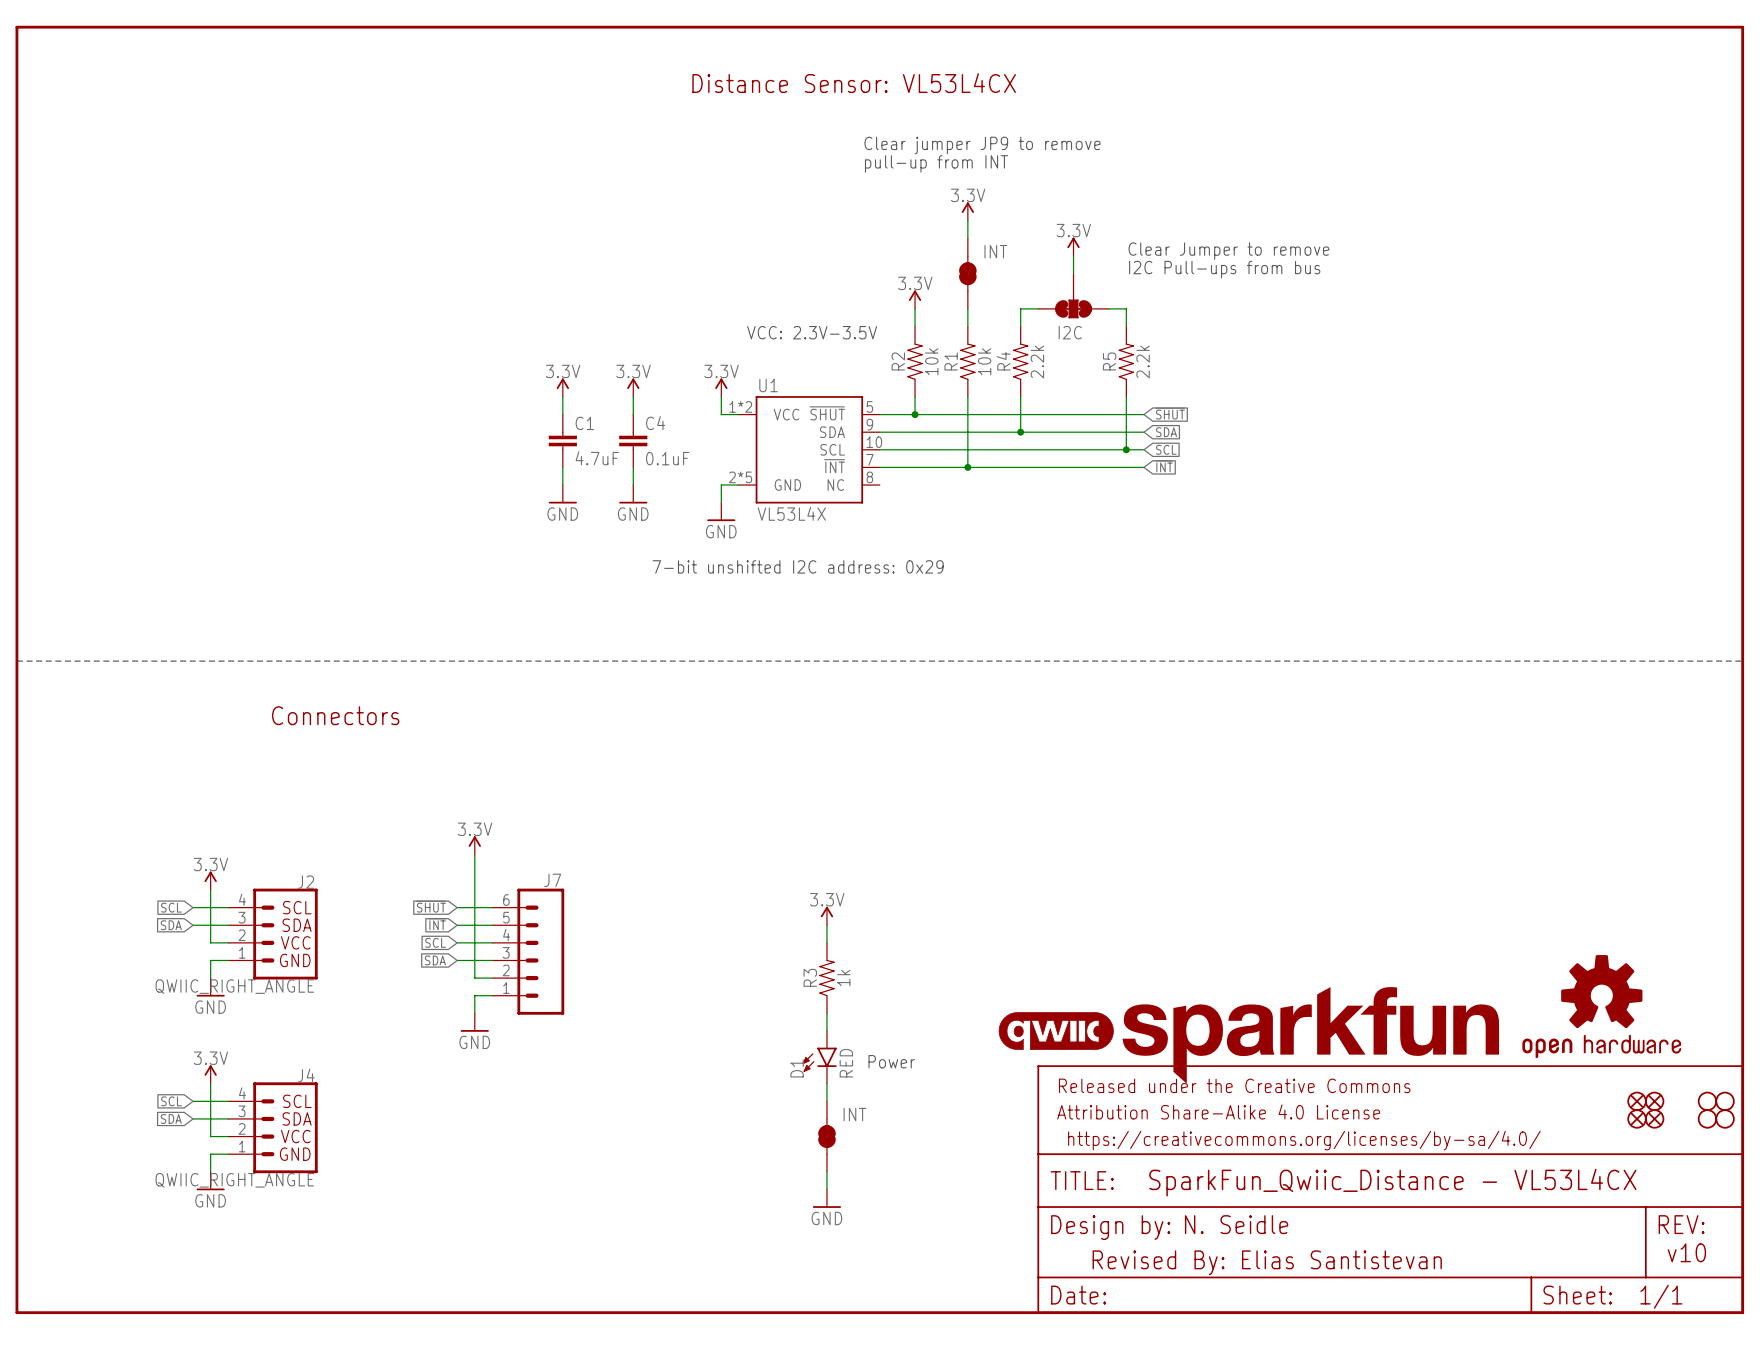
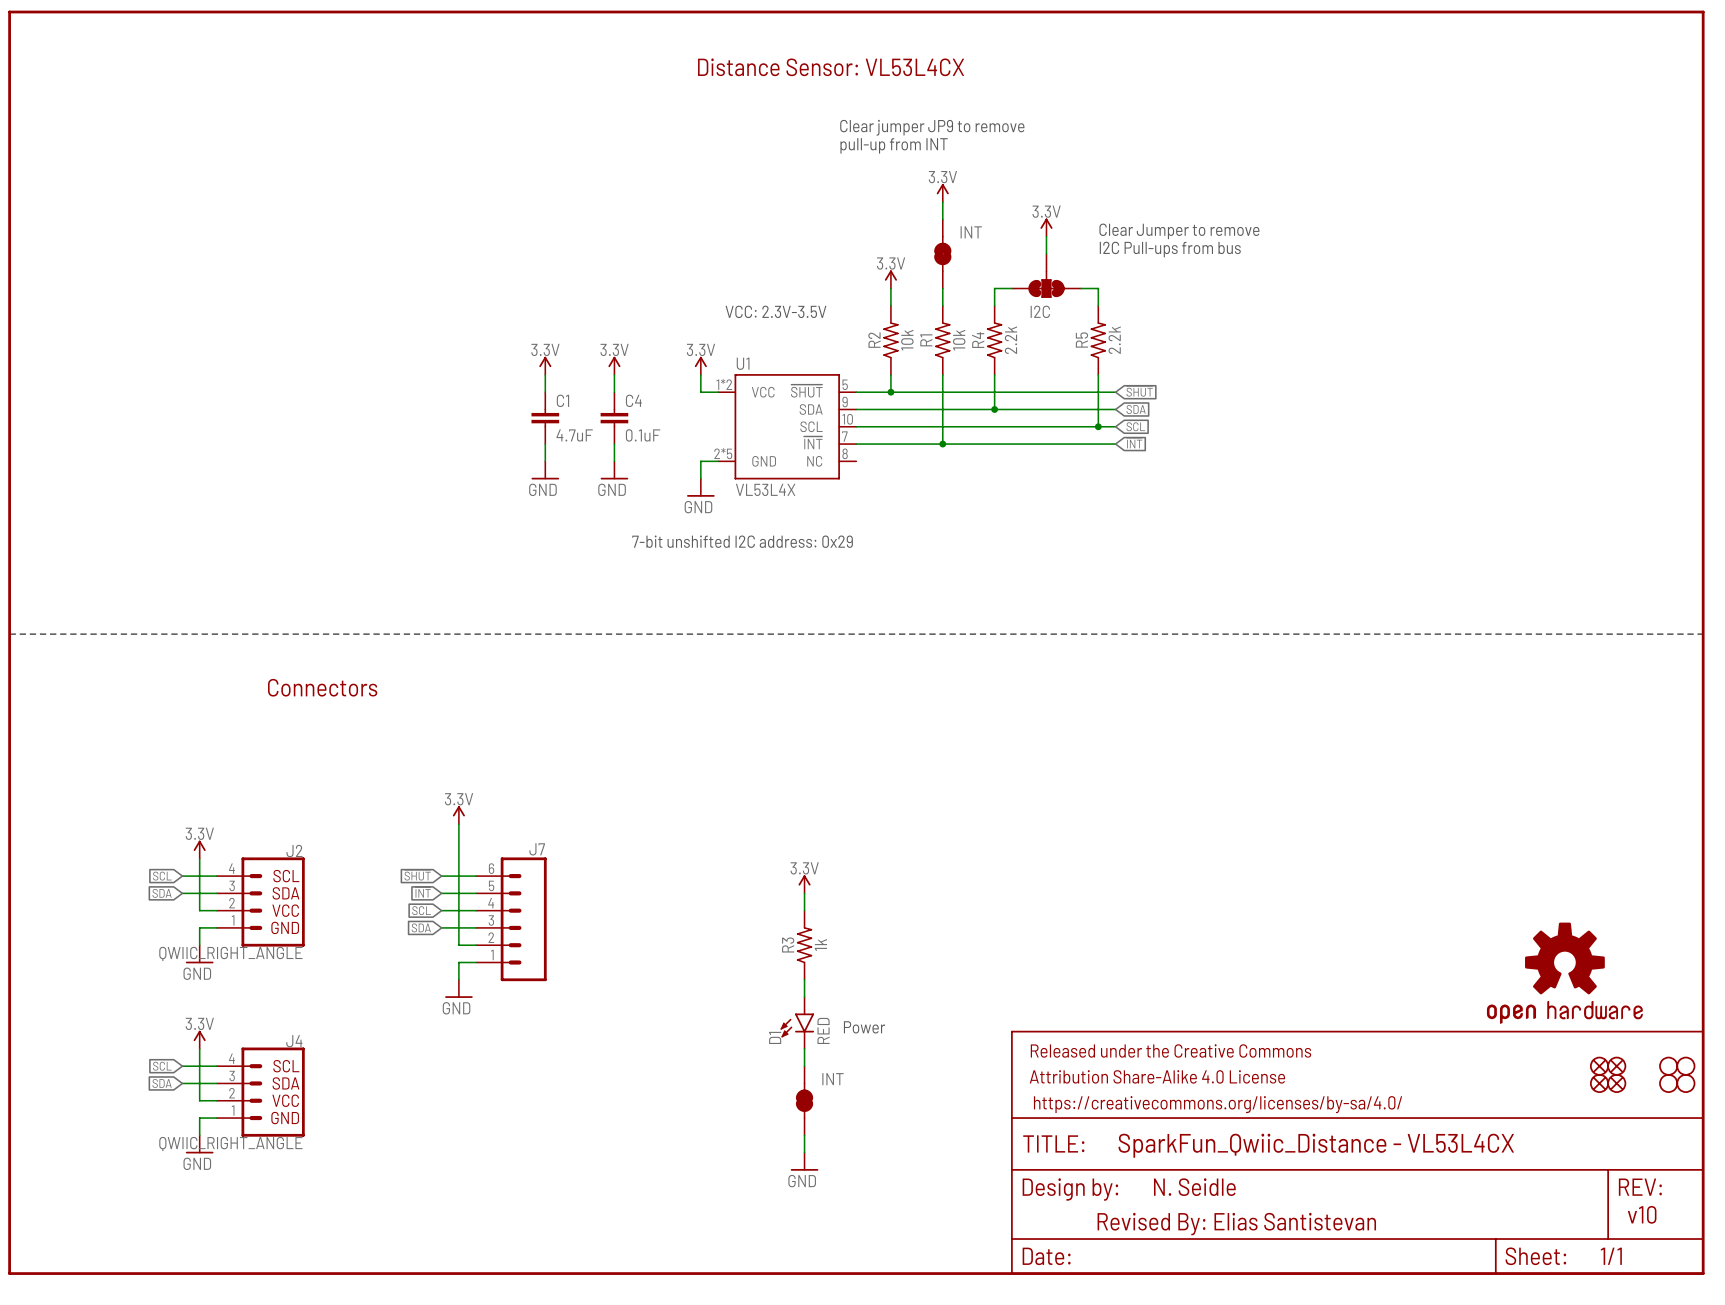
part: (1056, 1031) -> none
part: (1310, 1035) -> none

